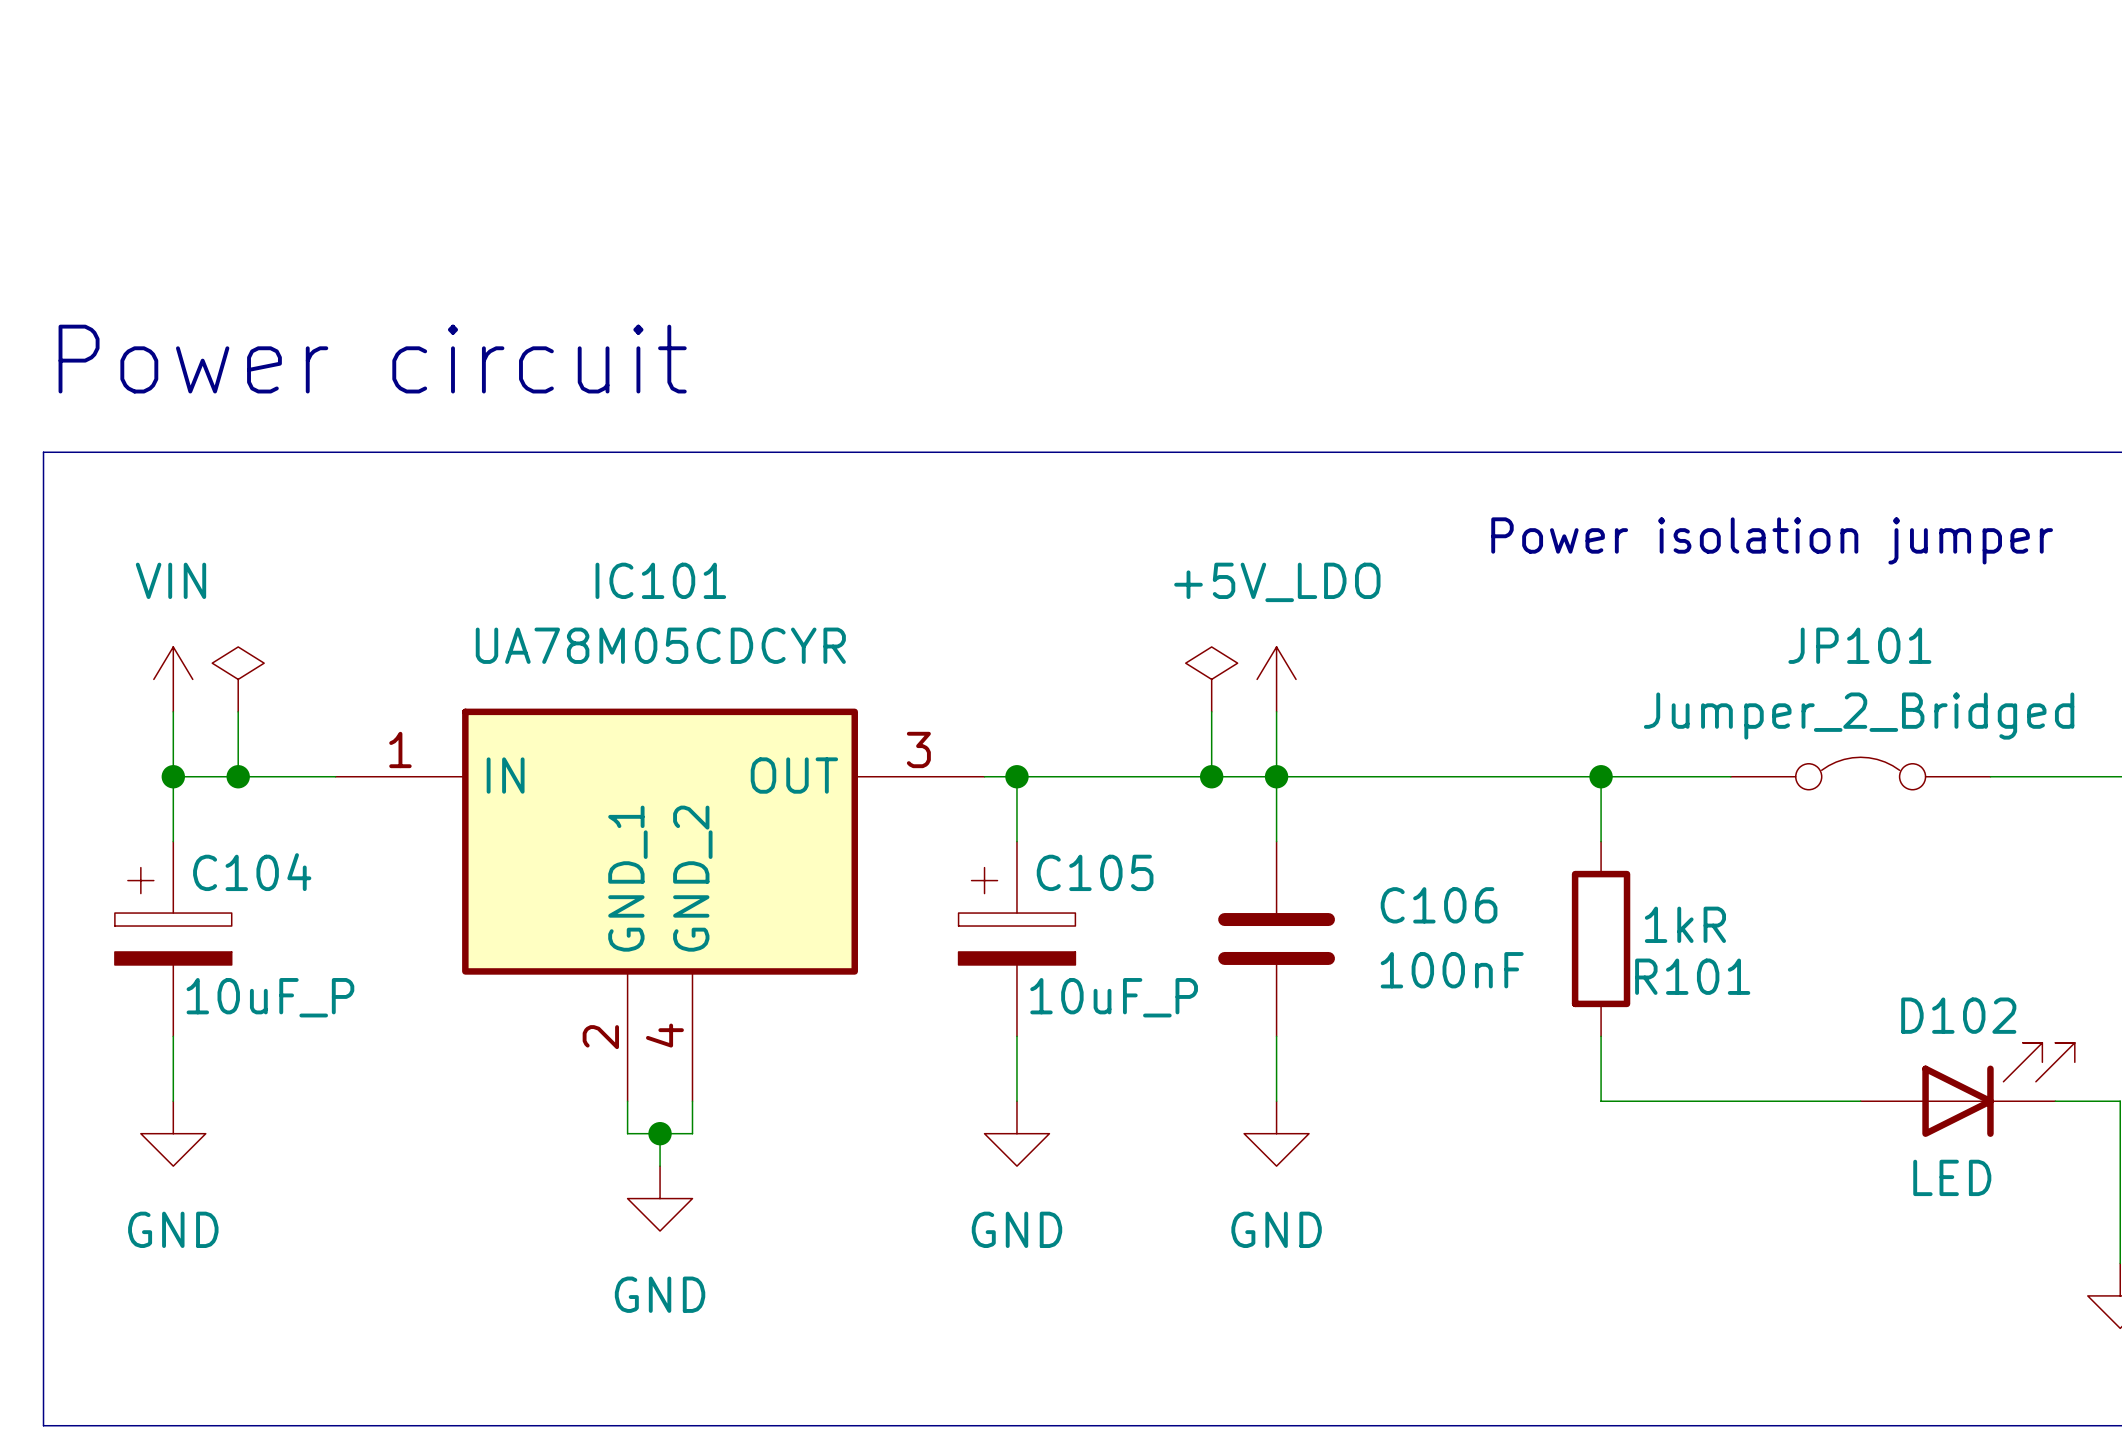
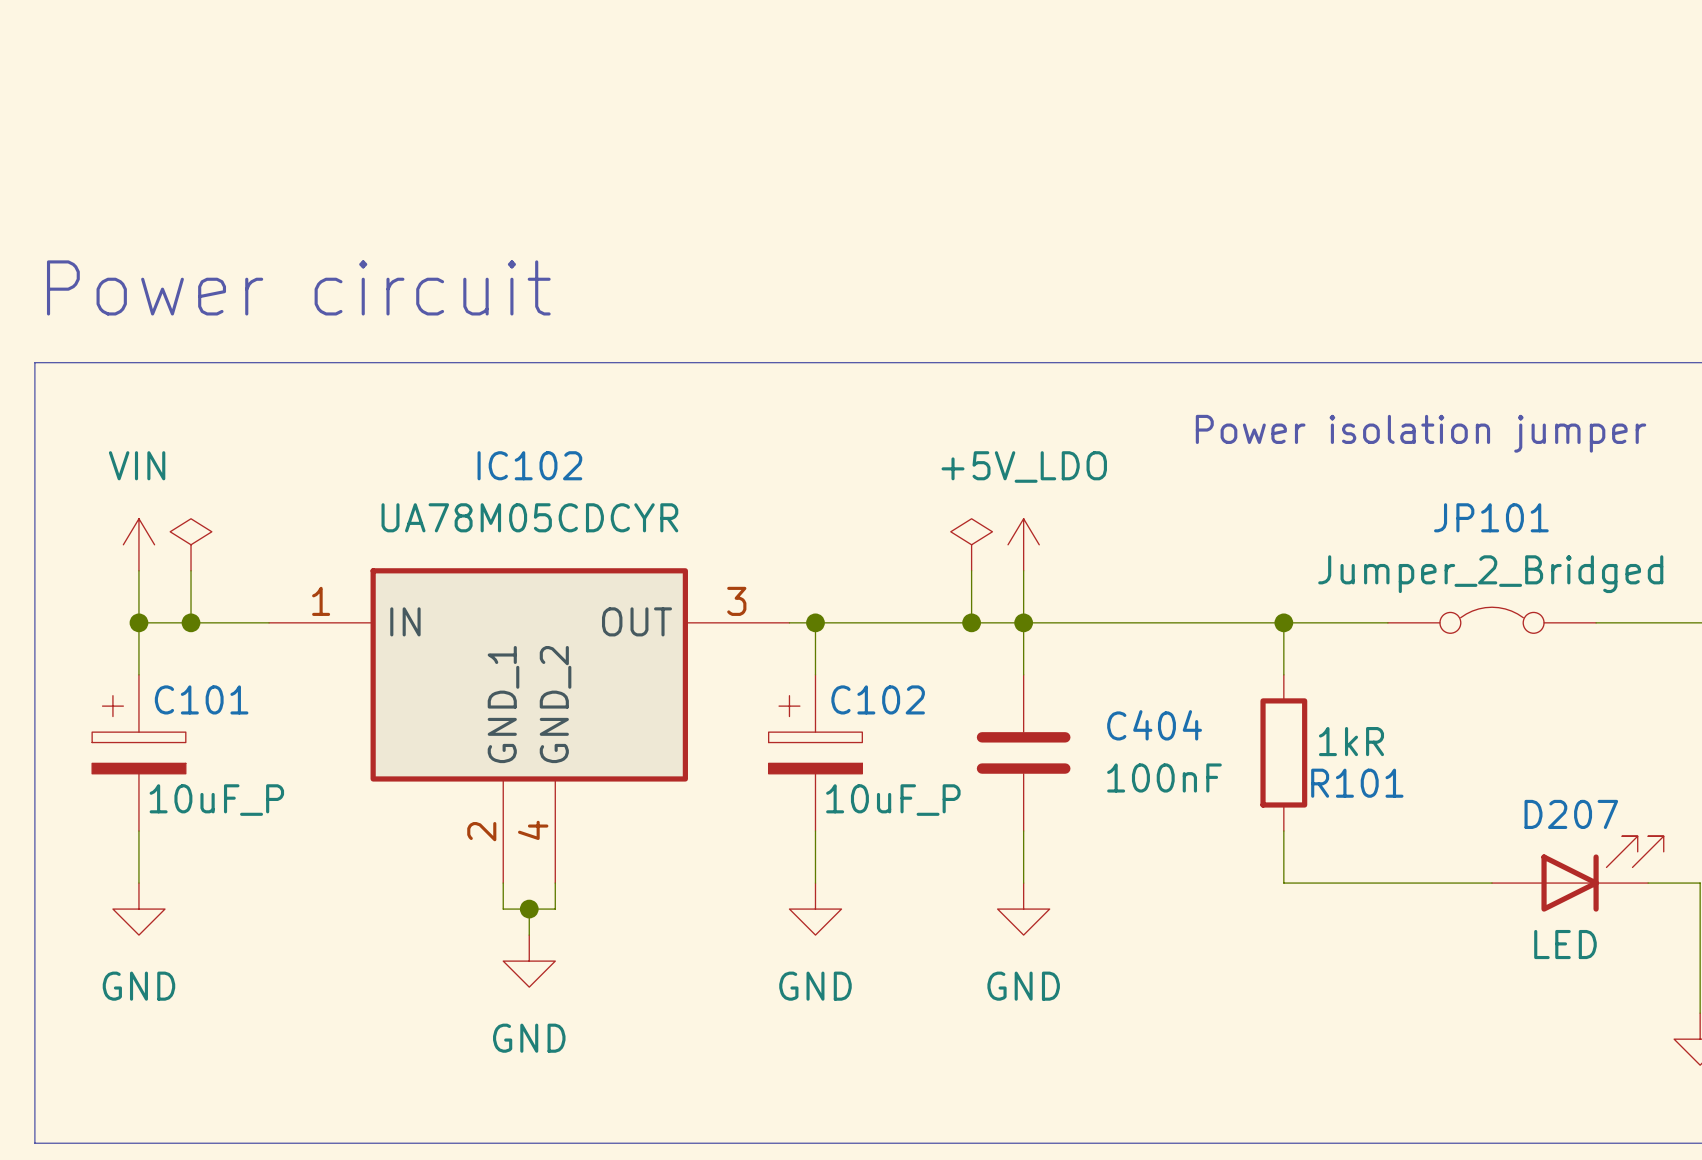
IC101 name: IC101 (660, 580) -> IC102 (529, 465)
C104 name: C104 (252, 872) -> C101 (201, 699)
C105 name: C105 (1095, 872) -> C102 (878, 699)
C106 name: C106 (1439, 905) -> C404 (1154, 725)
D102 name: D102 (1958, 1015) -> D207 (1571, 814)

